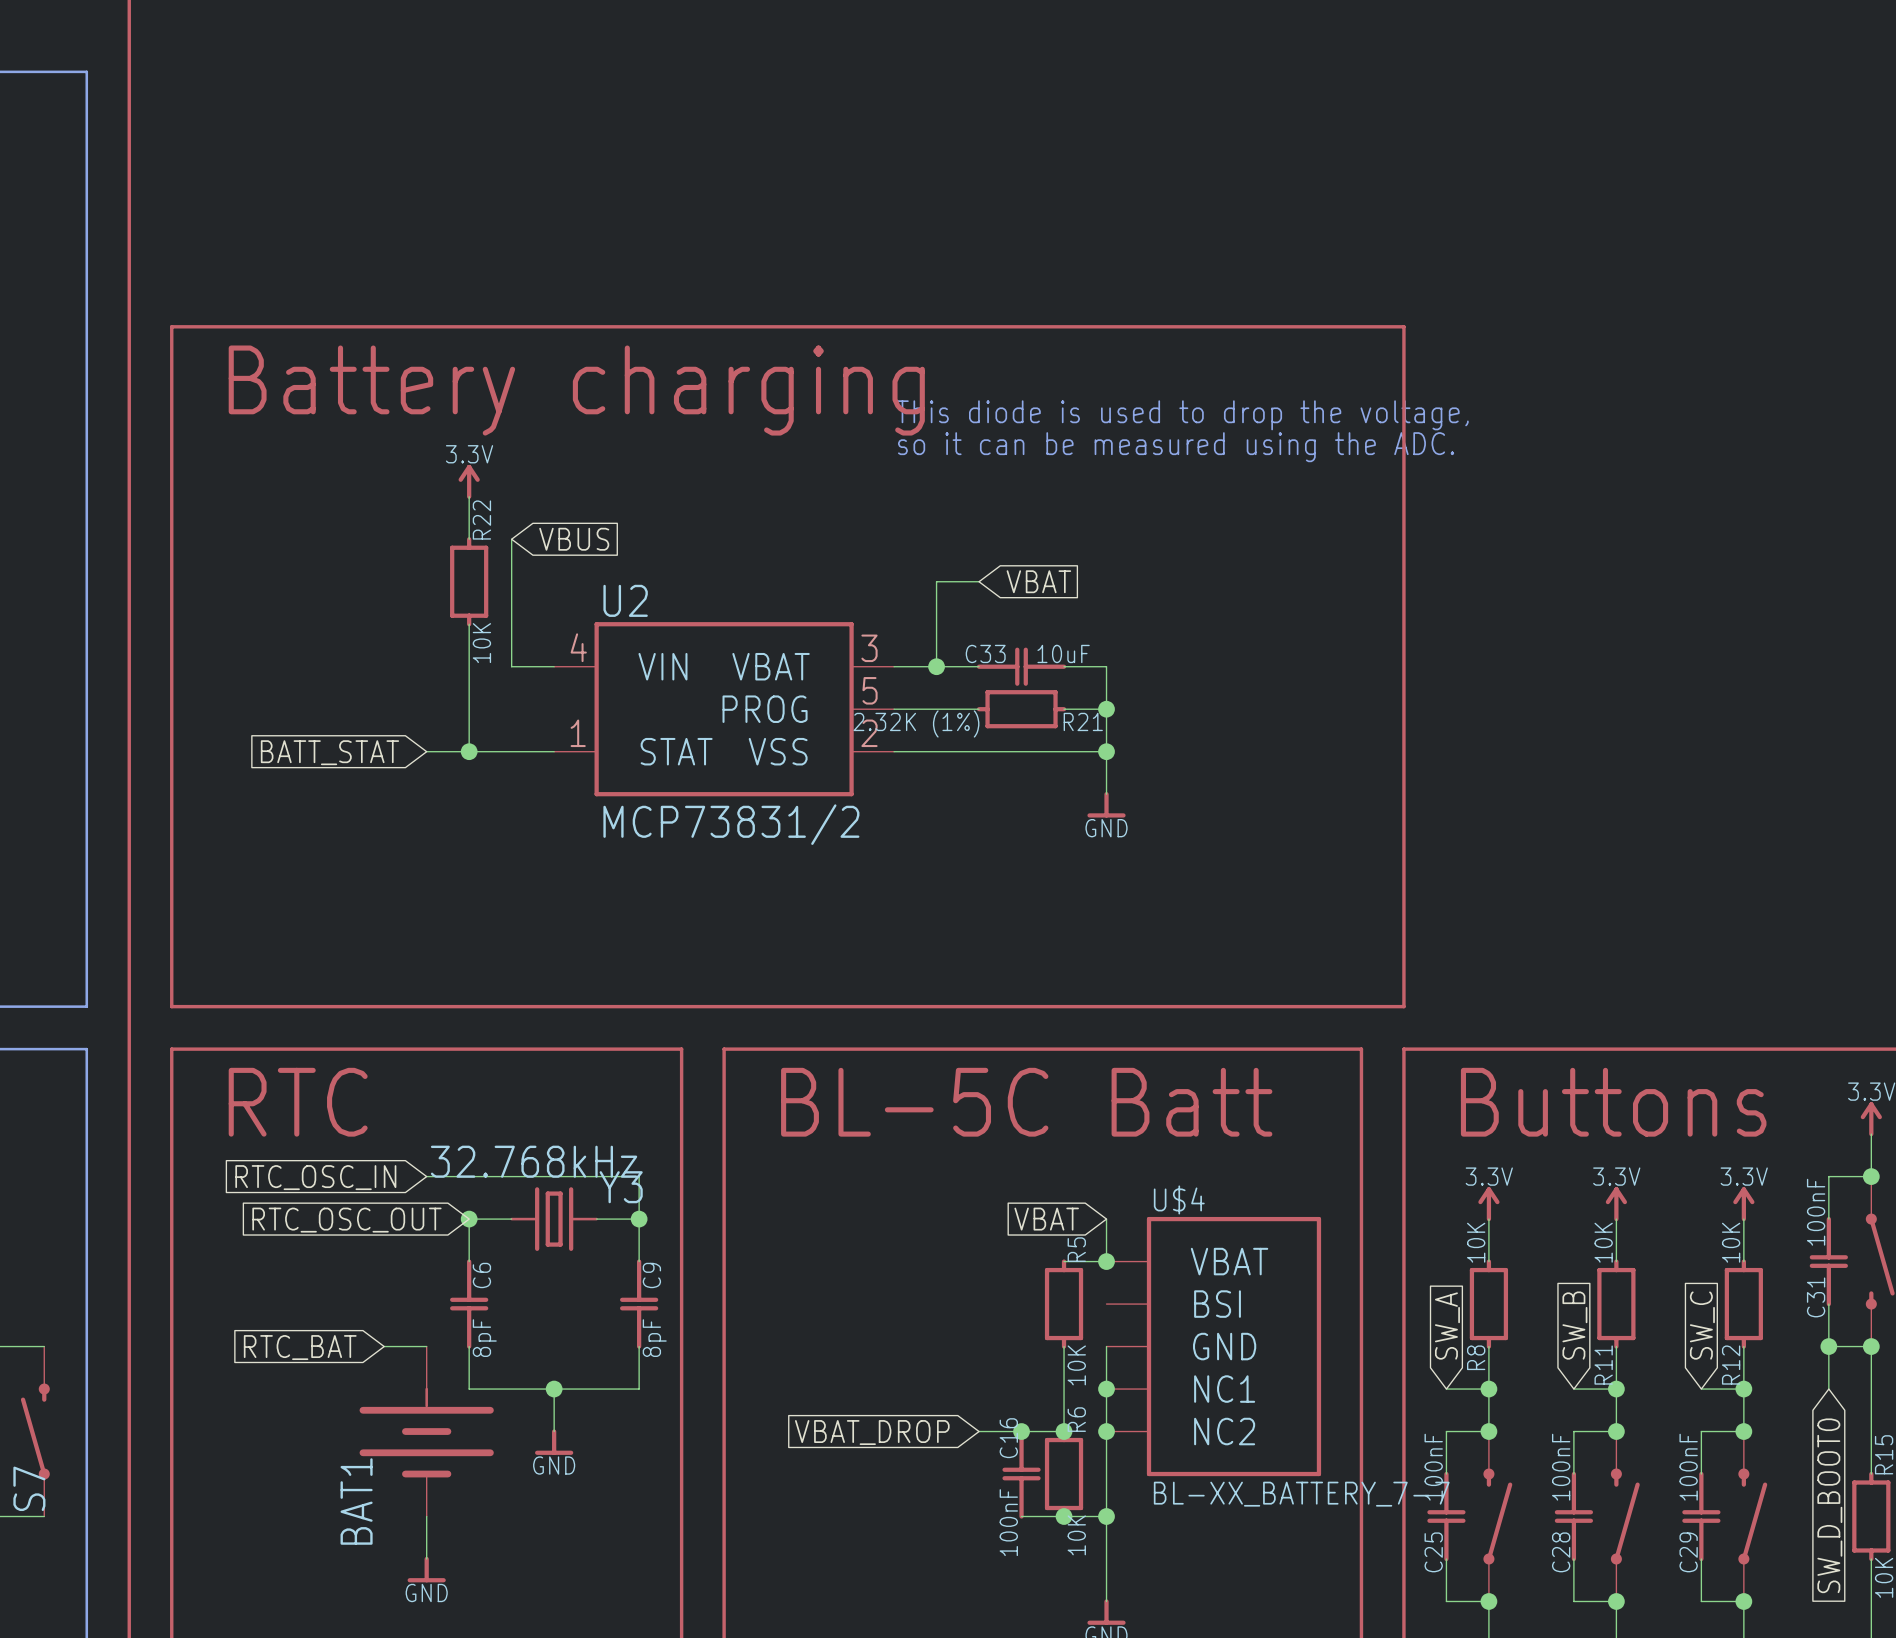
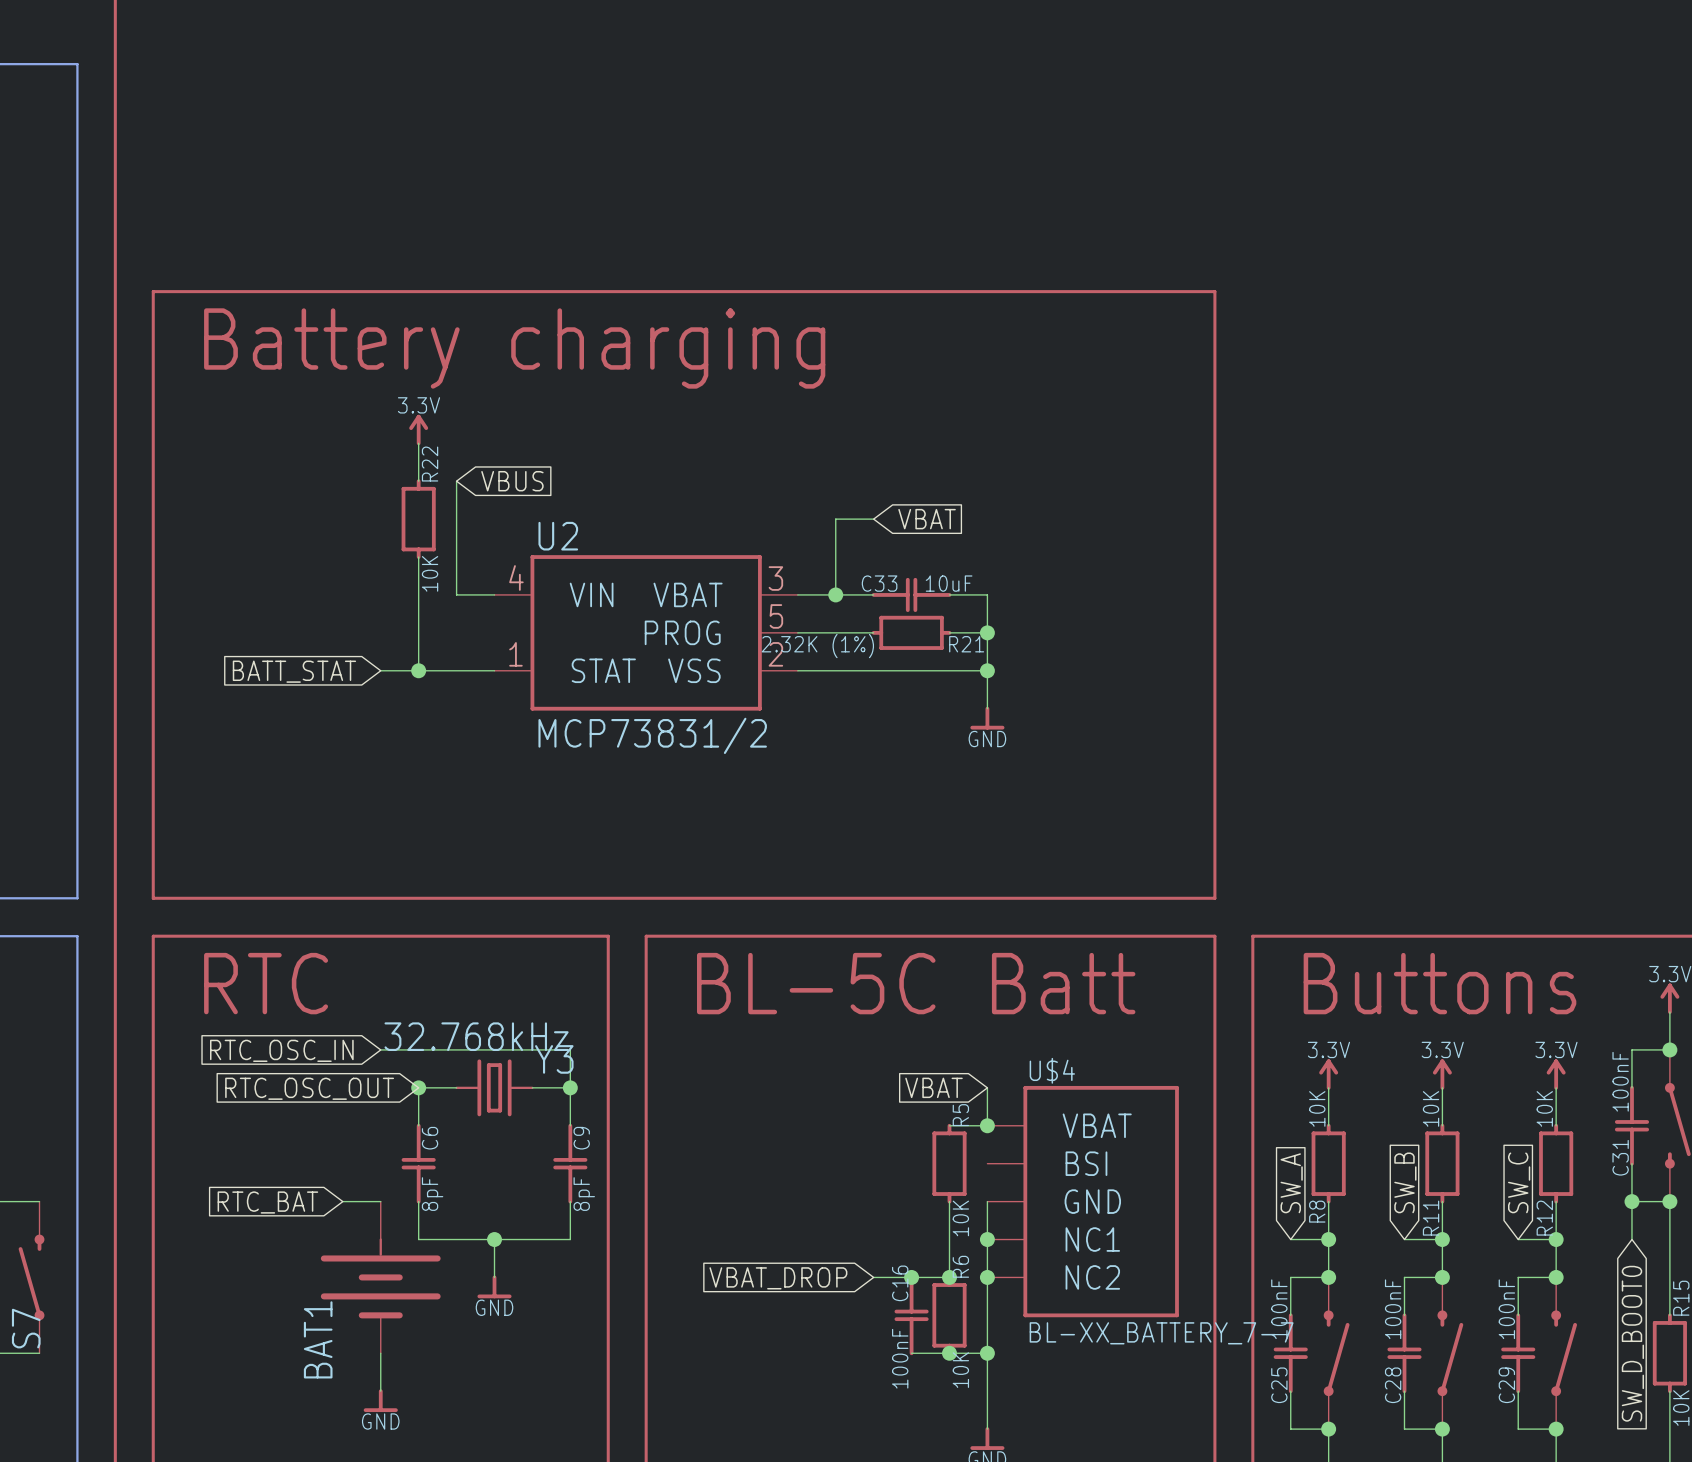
line: (1361, 326) (1403, 326) (1403, 1006) (1361, 1006) -> (1214, 291) (1214, 898)
text: This diode is used to drop the voltage, (1182, 415) -> none
text: so it can be measured using the ADC. (1176, 447) -> none

